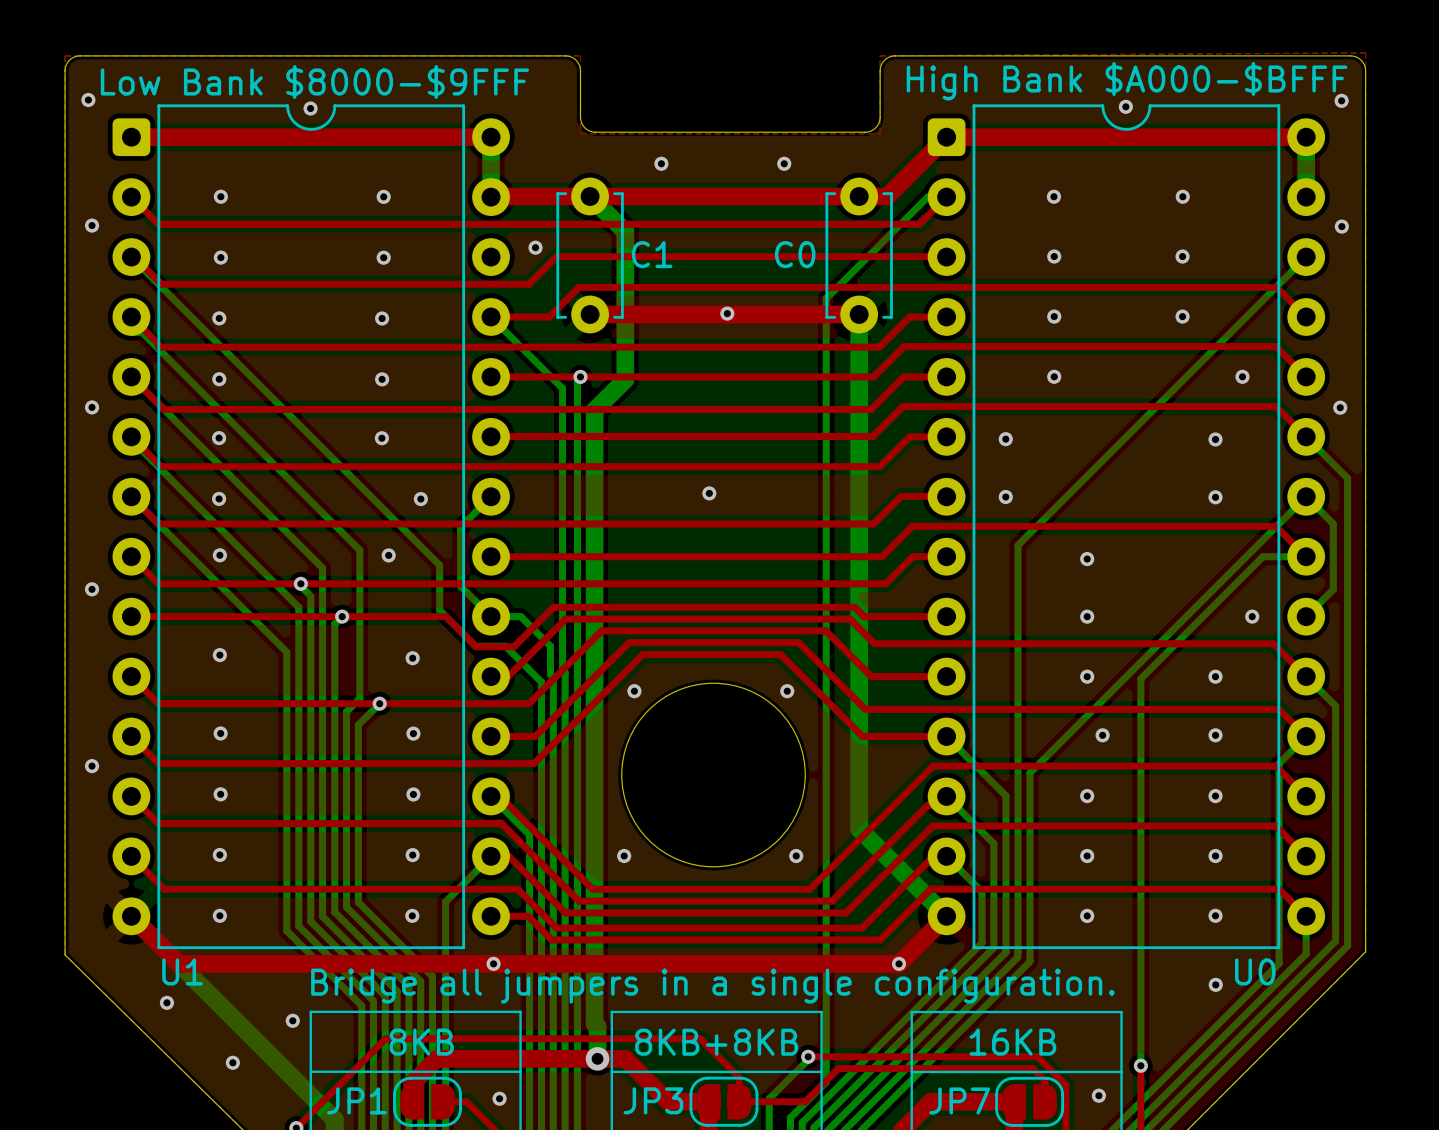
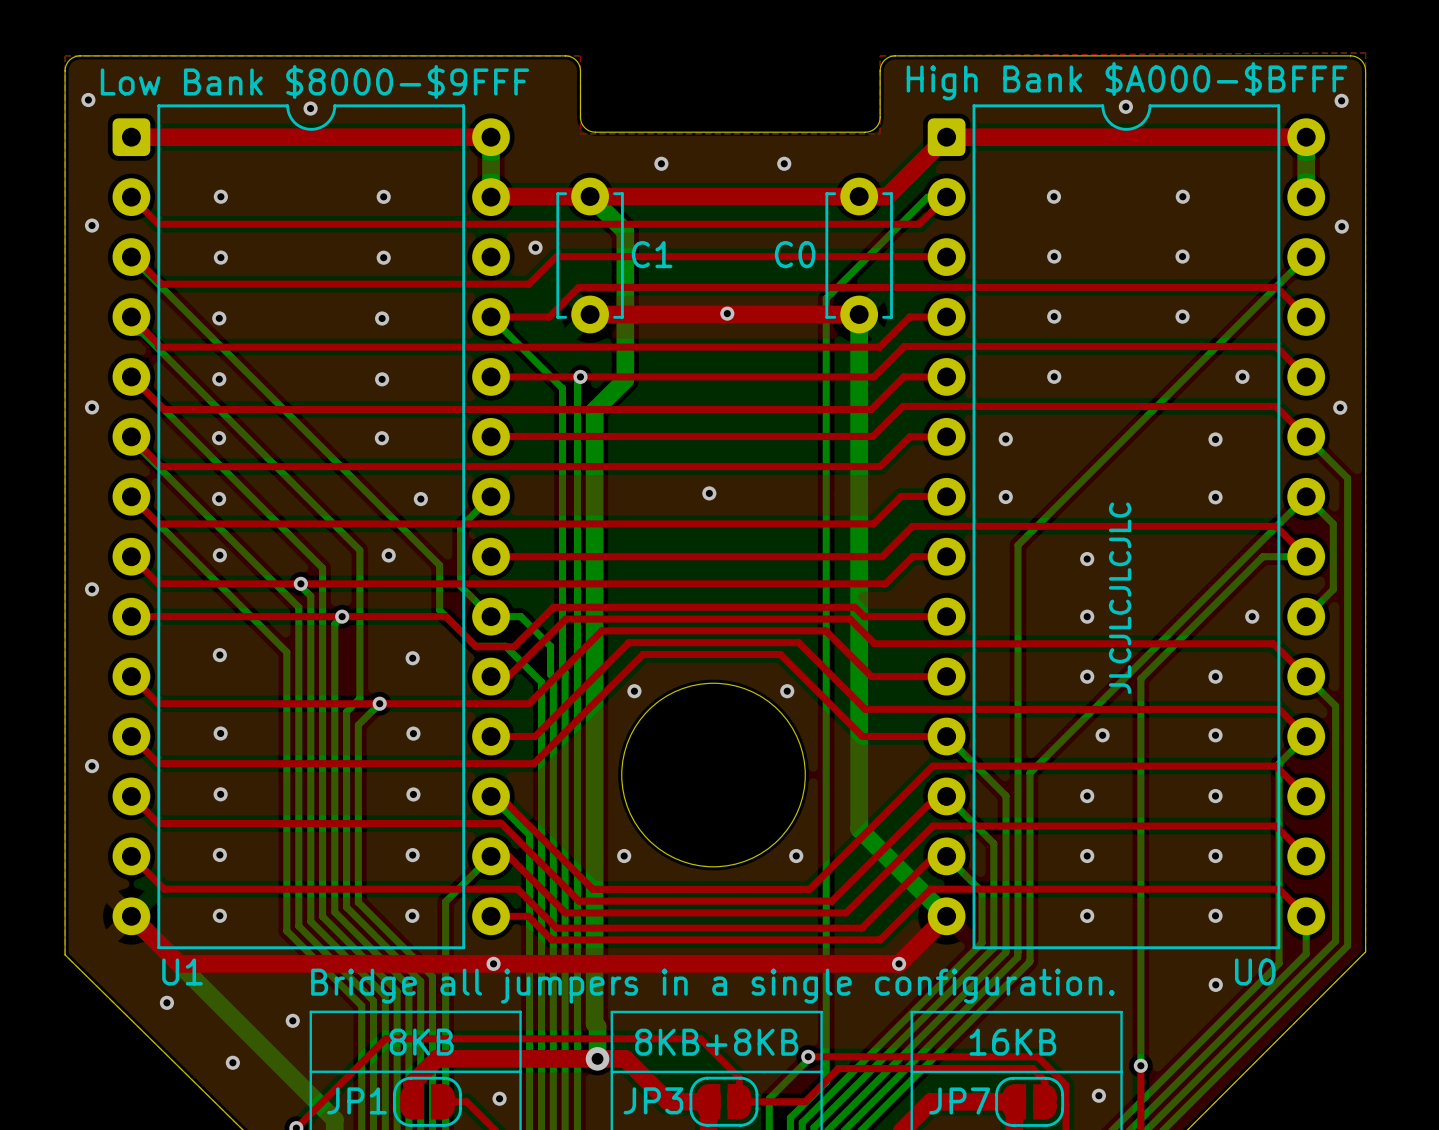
text: none -> JLCJLCJLCJLC (1120, 598)

